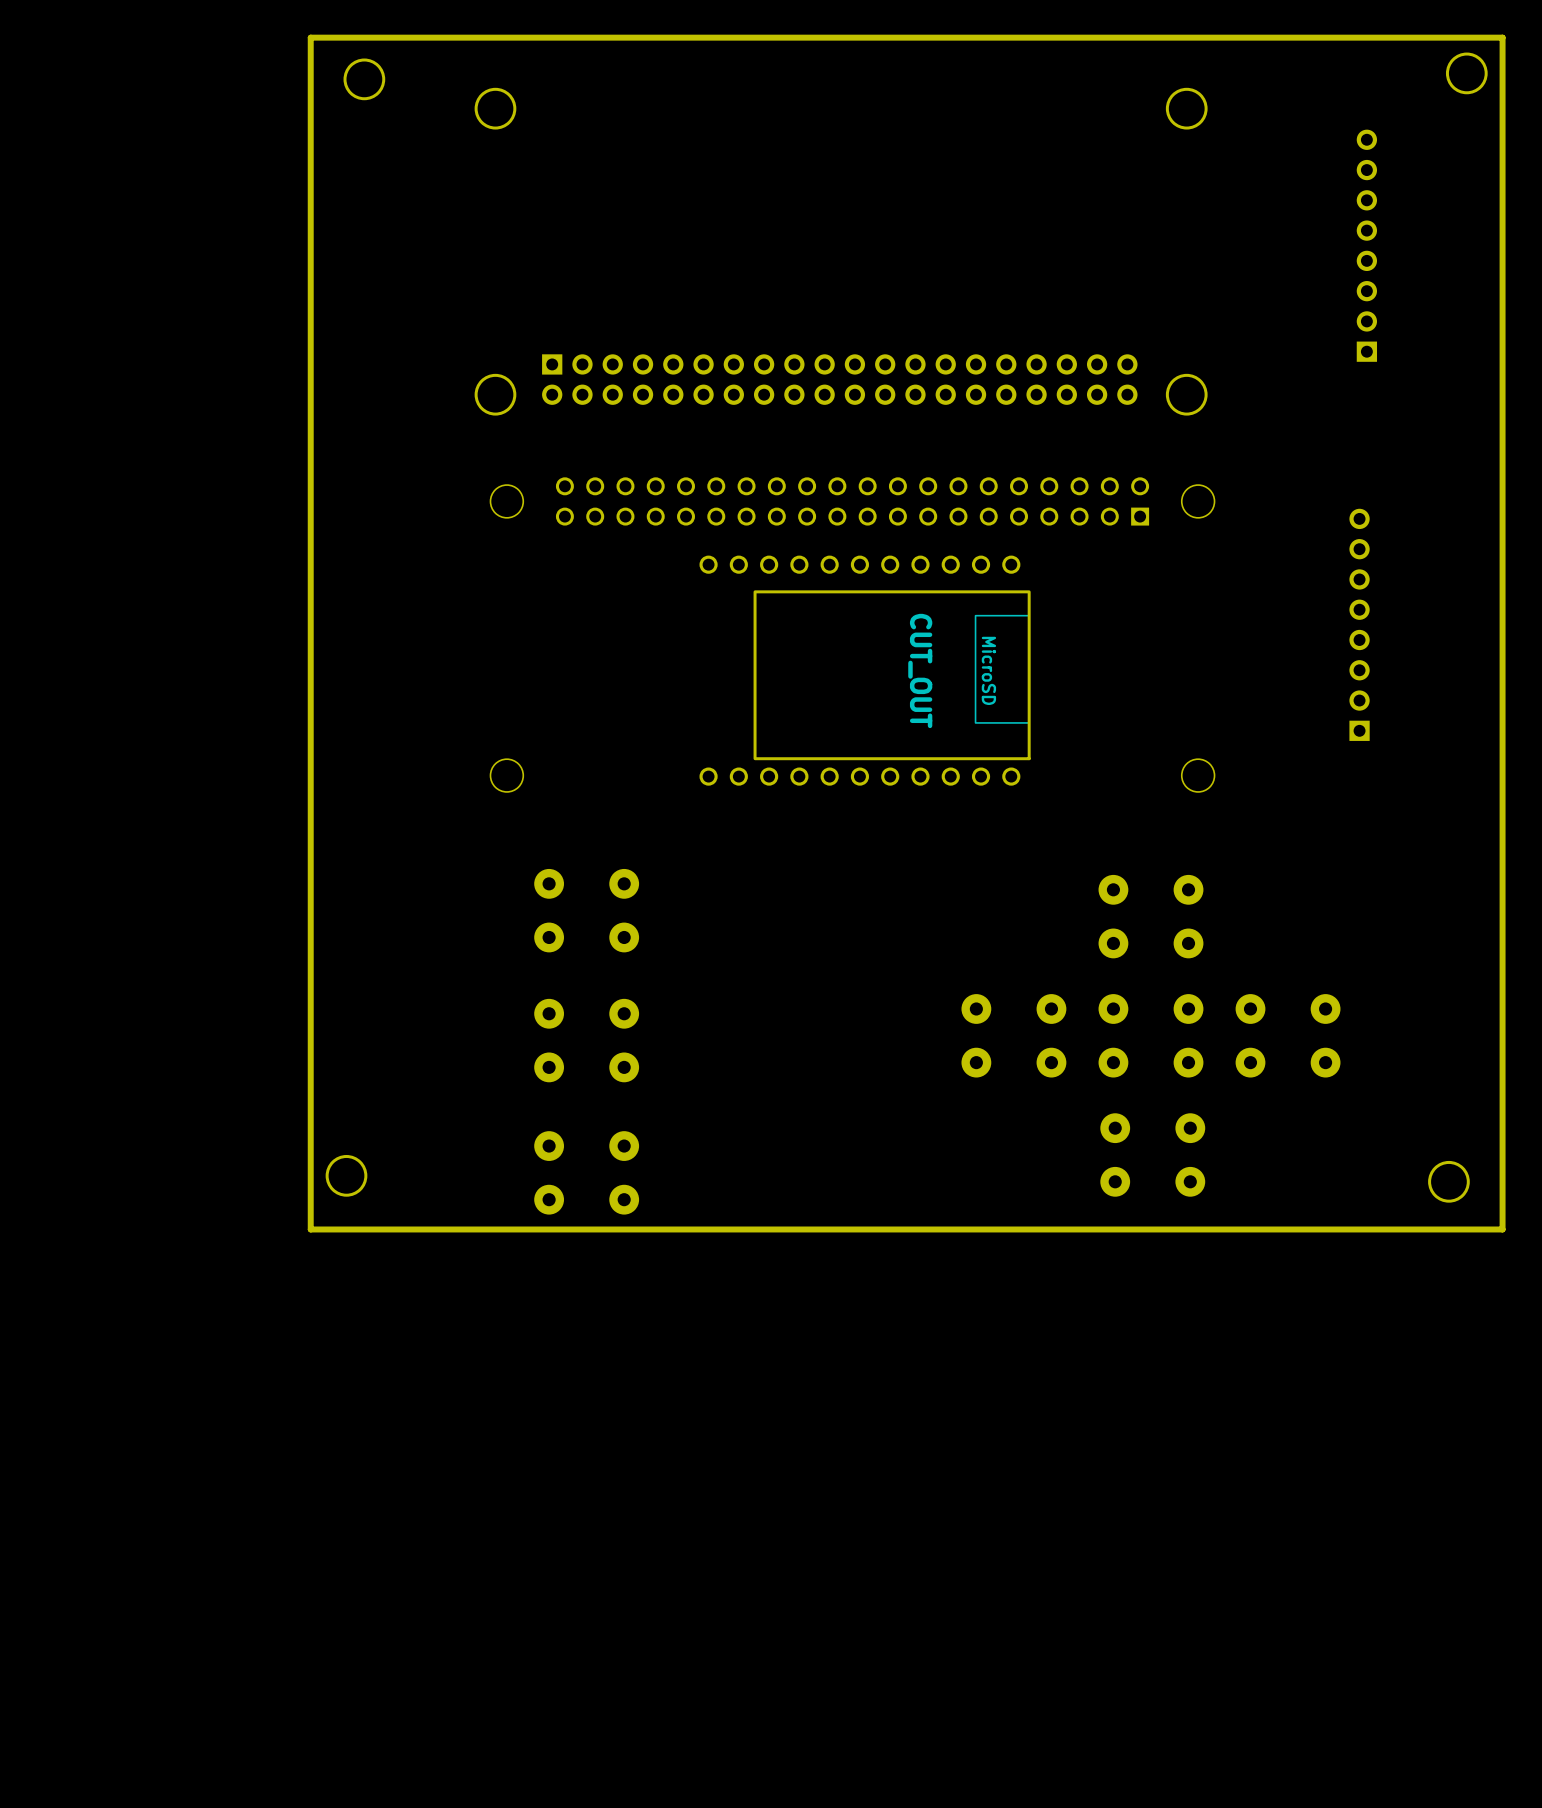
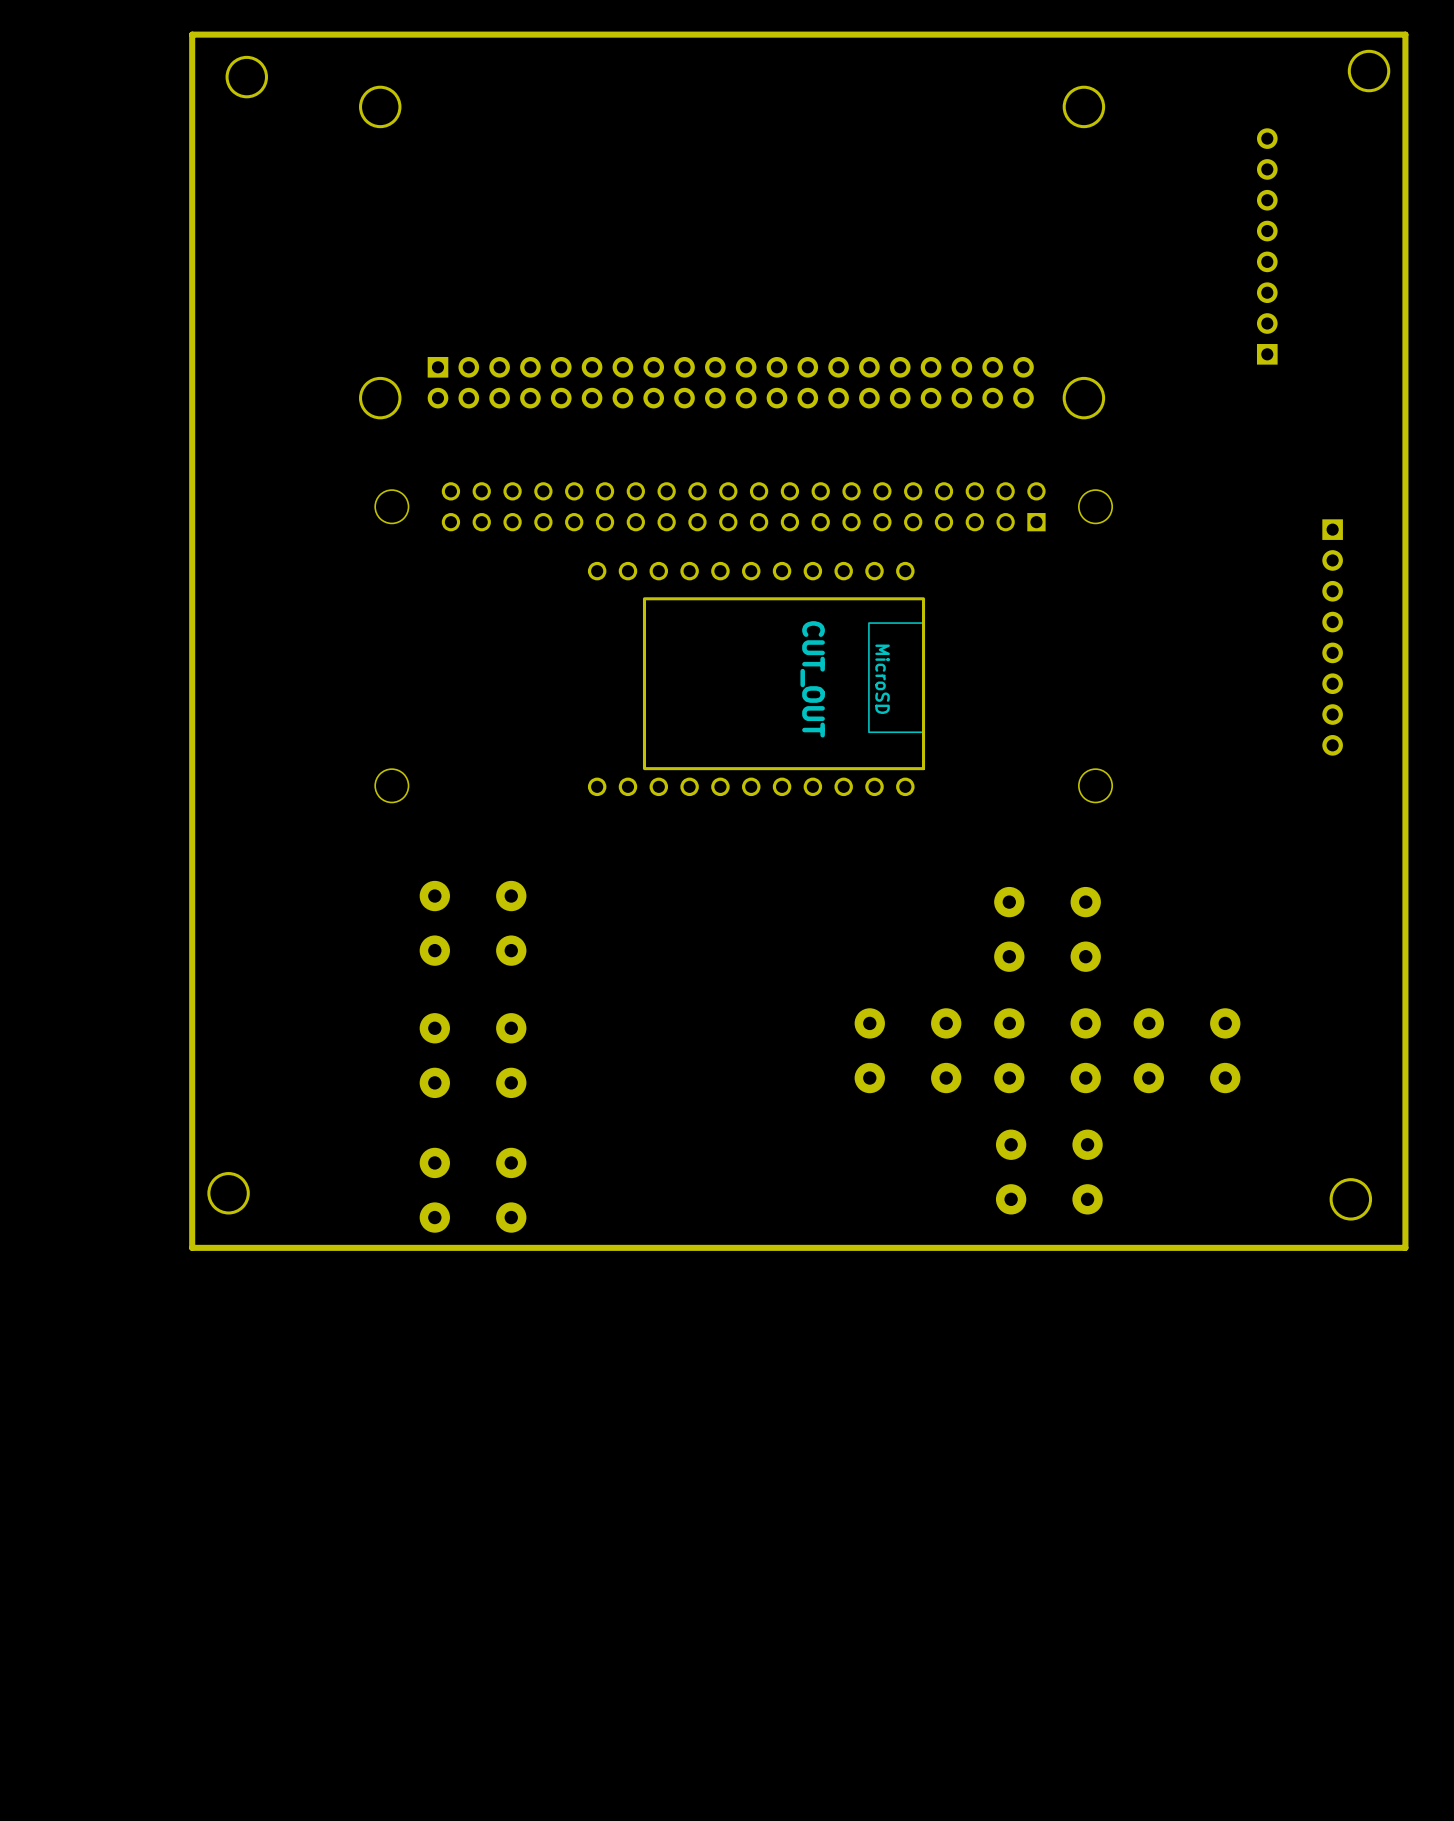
part rotation: 0° (1359, 624) -> 180° (1332, 637)

